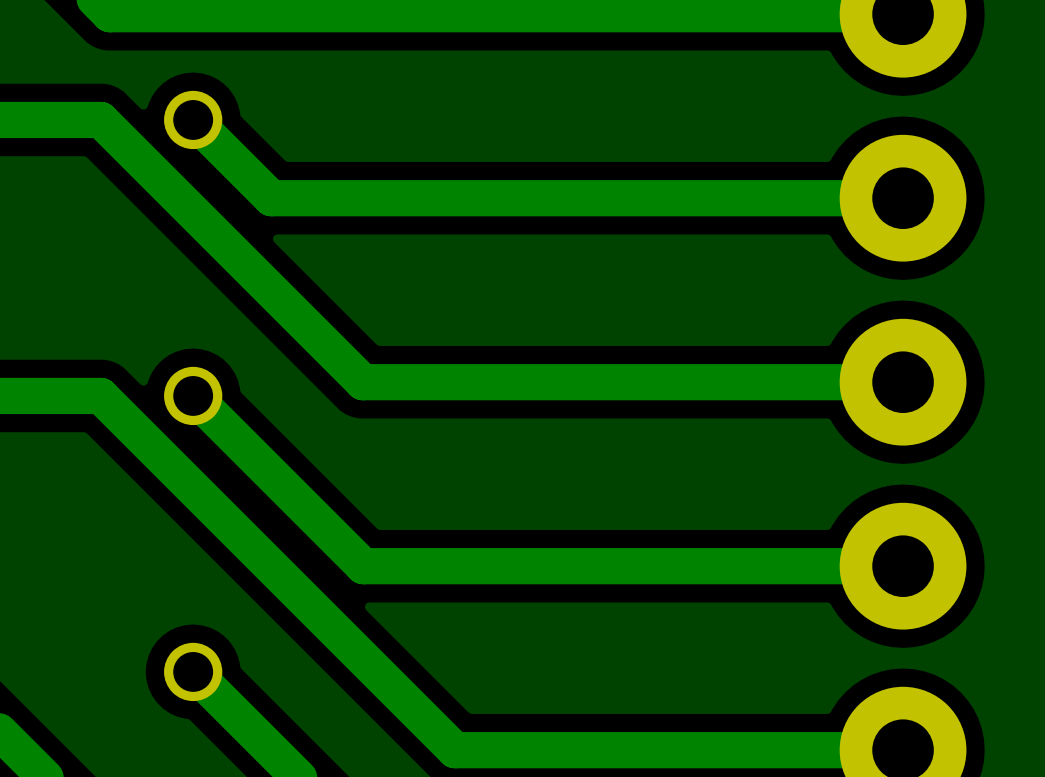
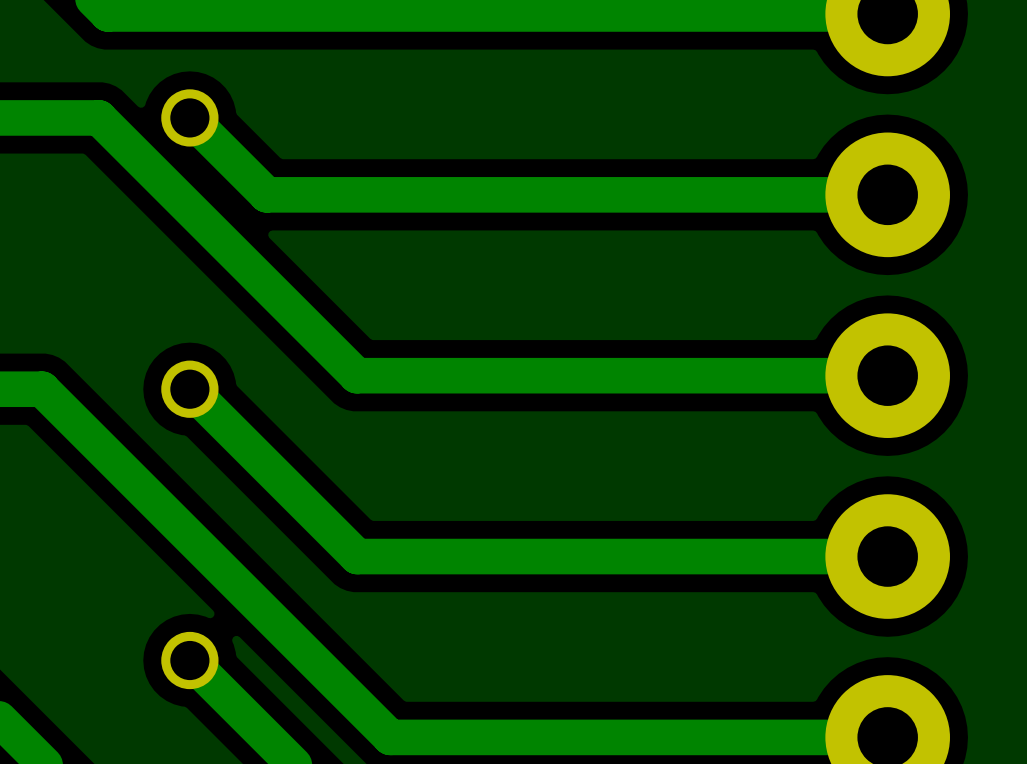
track: (42, 395) (100, 395) (454, 750) -> (42, 389) (390, 737) (447, 737)

